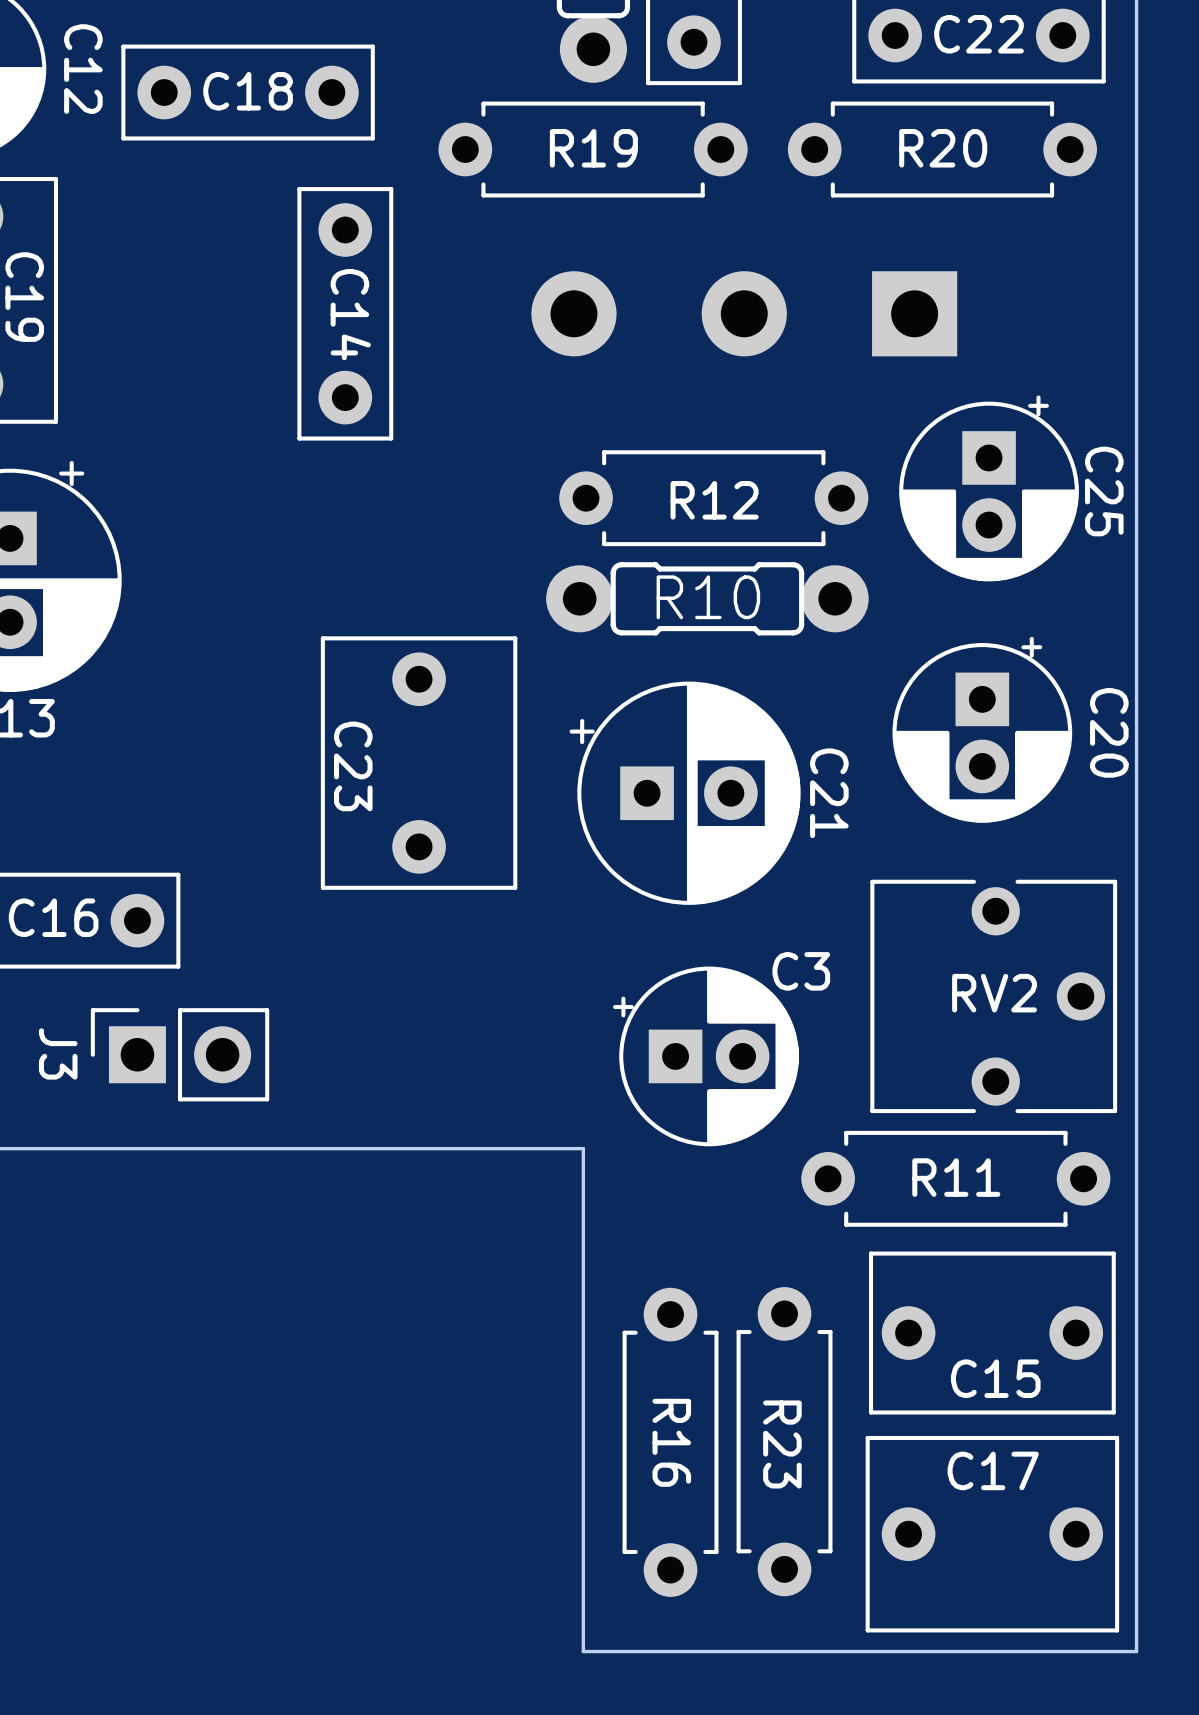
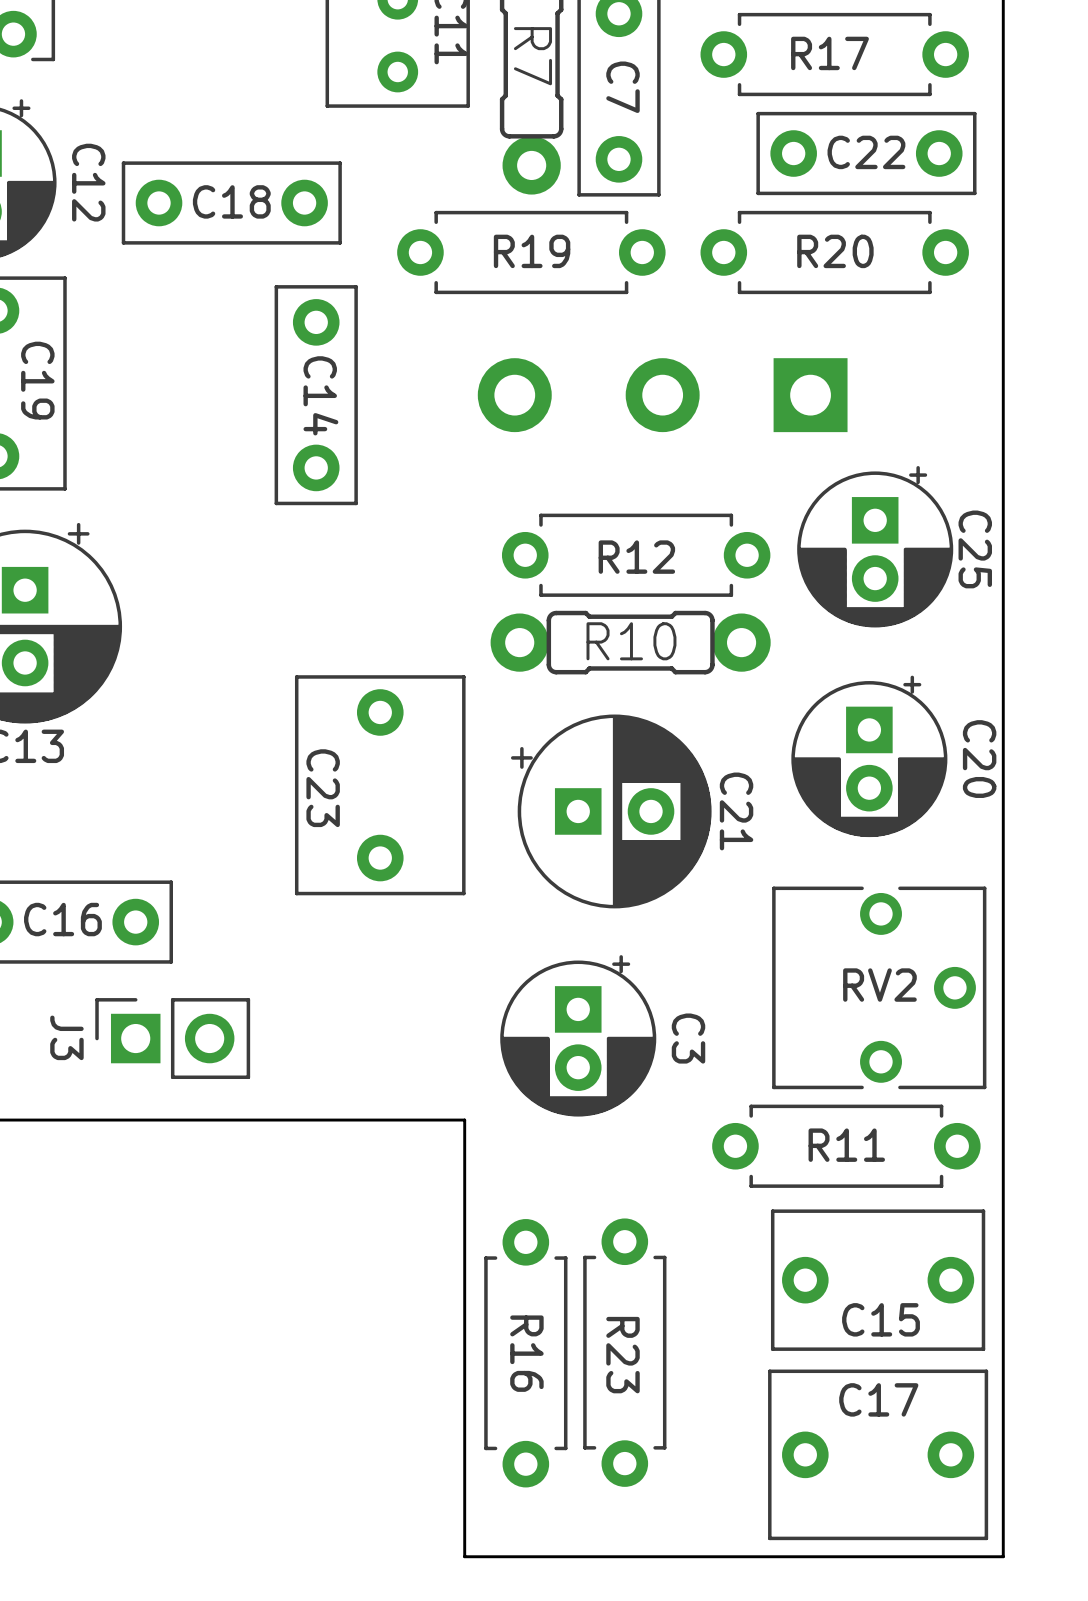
C3 name position: C3 (801, 971) -> C3 (688, 1038)
C3 rotation: 0° (705, 1056) -> 90° clockwise (578, 1035)
board edge: (516, 1148) (583, 1148) (583, 1651) -> (464, 1120) (464, 1556) (522, 1556)
R23 position: (784, 1441) -> (624, 1352)
R16 position: (670, 1442) -> (525, 1353)

